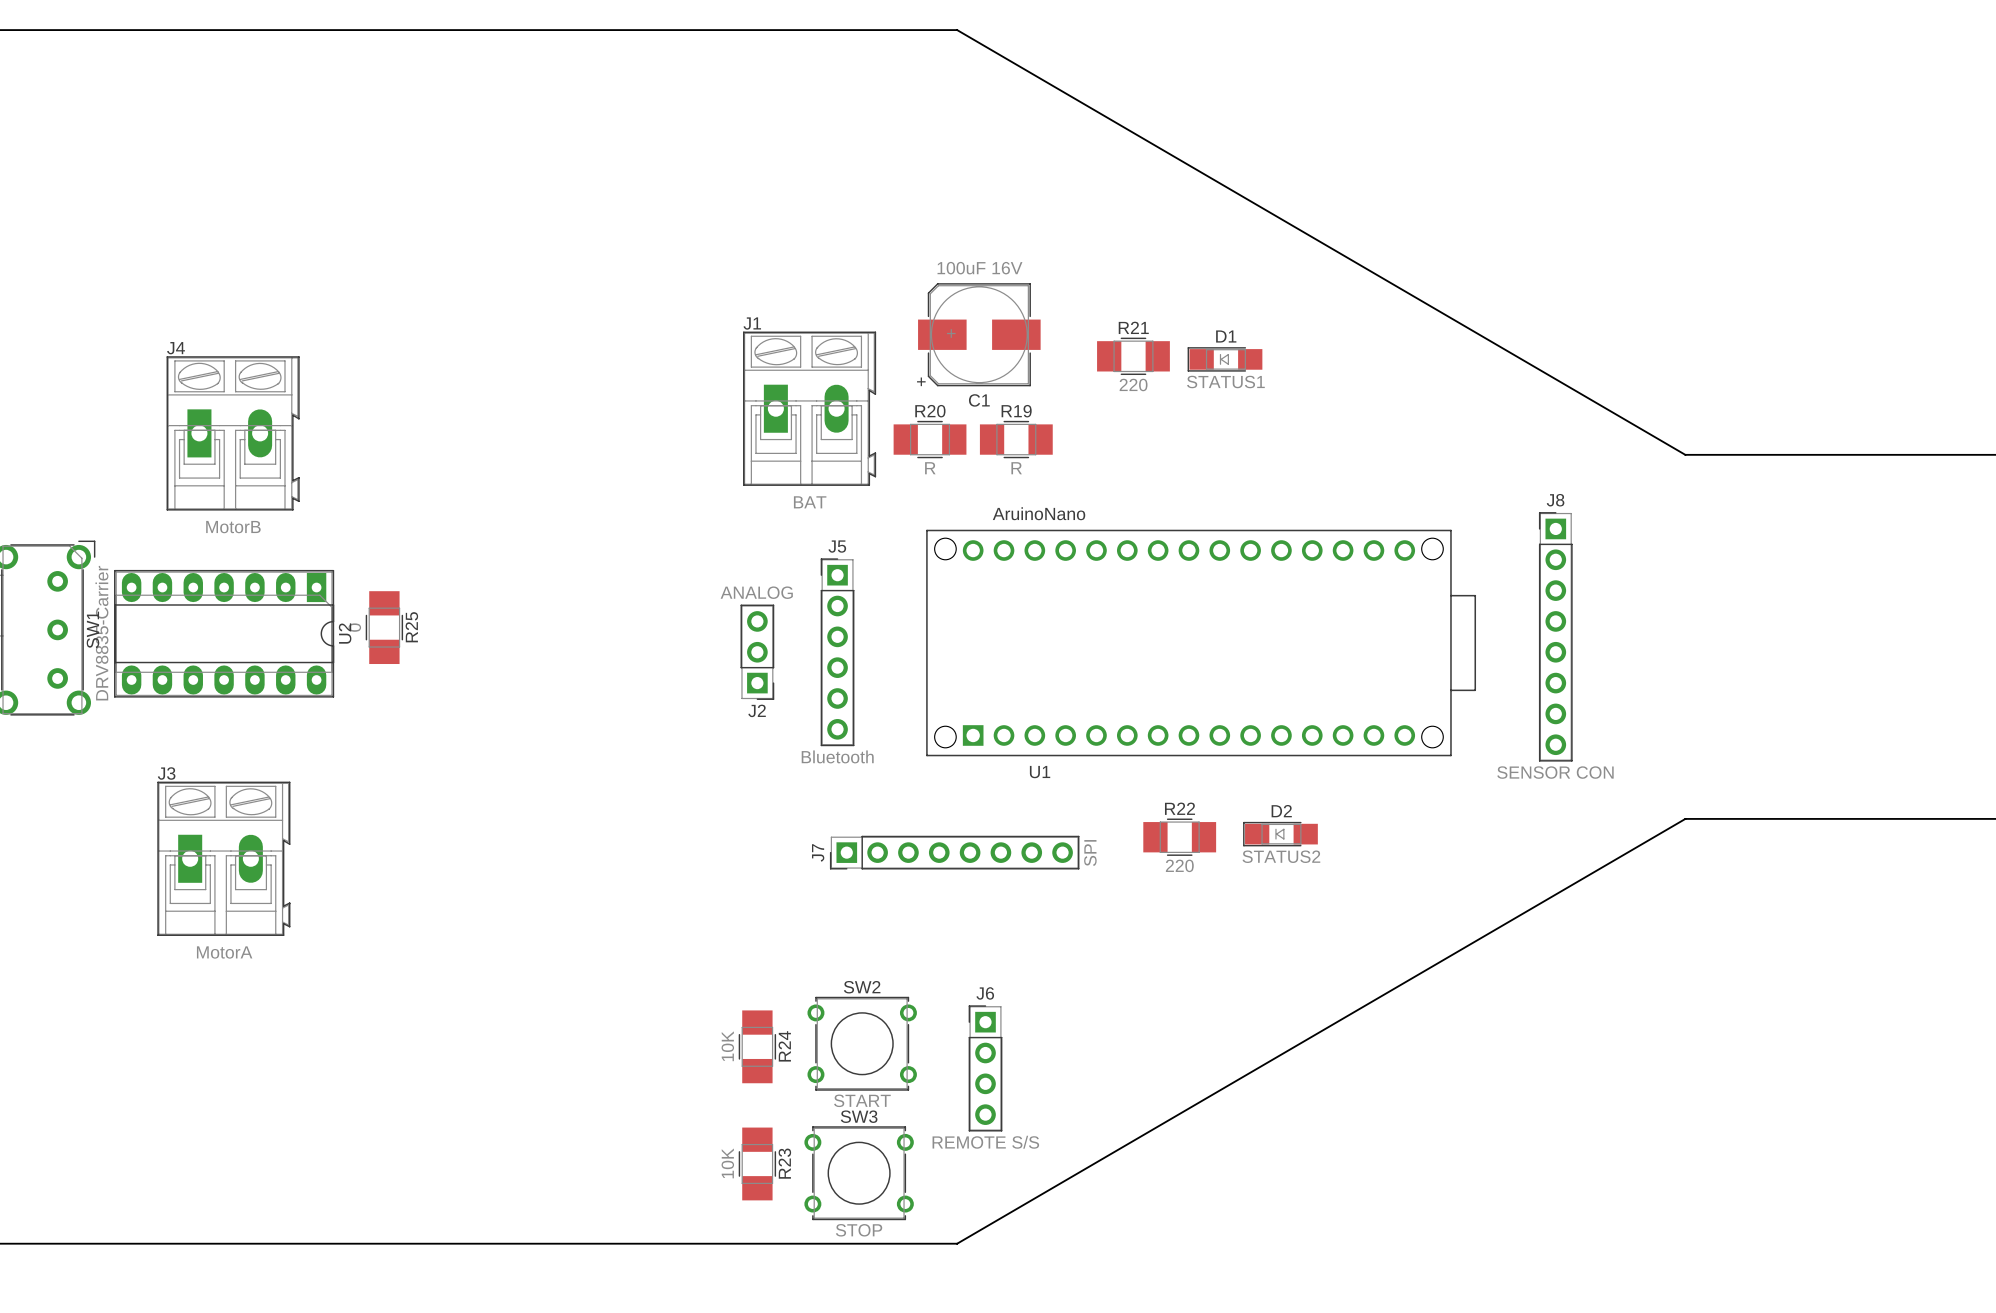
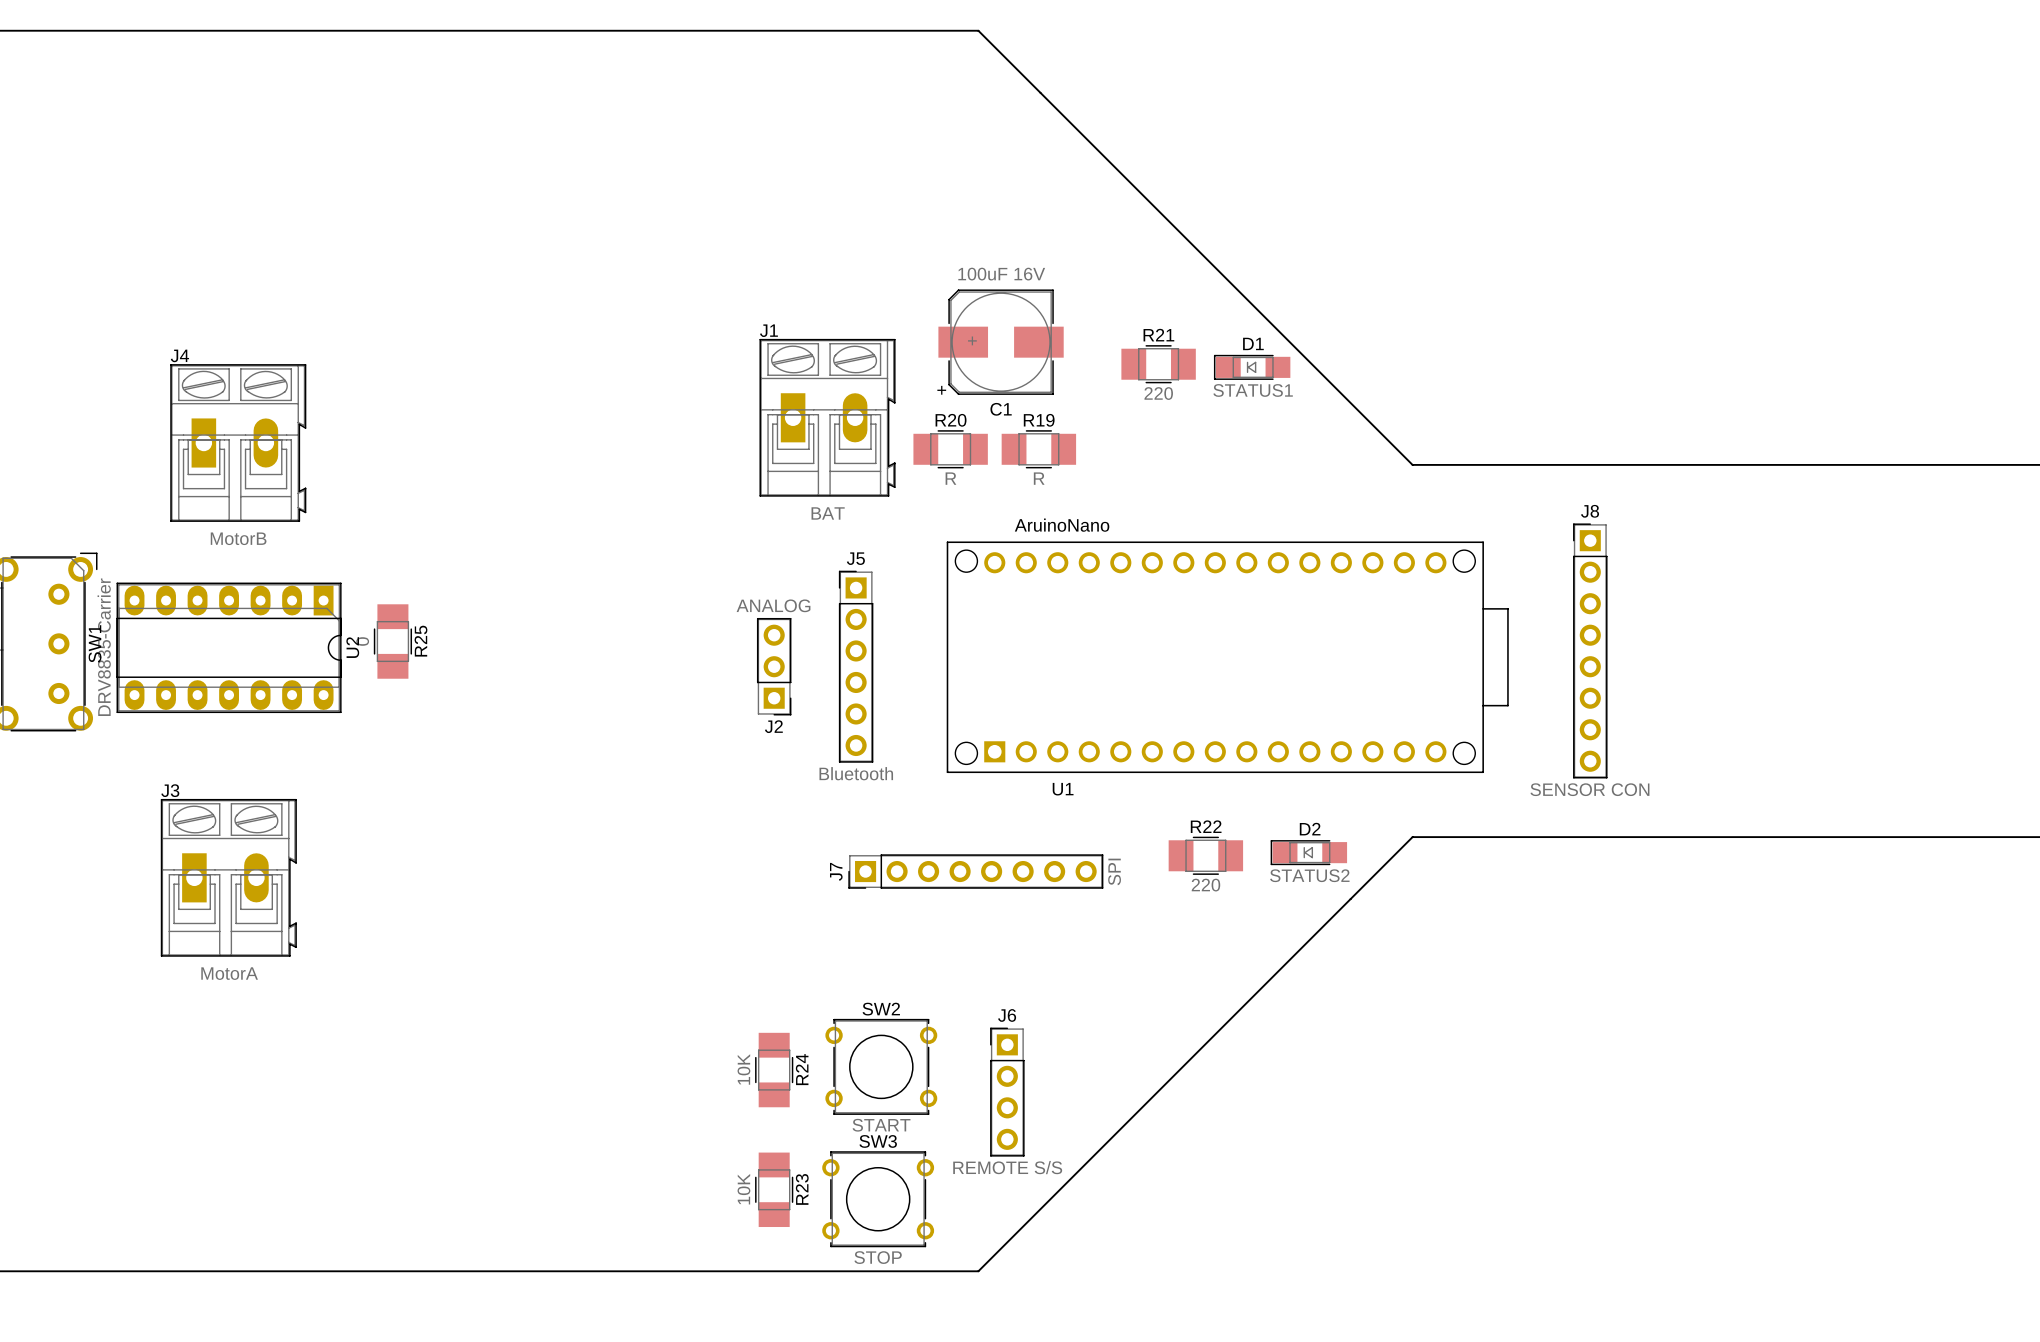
board edge: (957, 30) (1685, 454) -> (978, 30) (1412, 464) (1722, 464)
board edge: (1685, 818) (957, 1243) -> (1722, 837) (1412, 837) (978, 1271)

